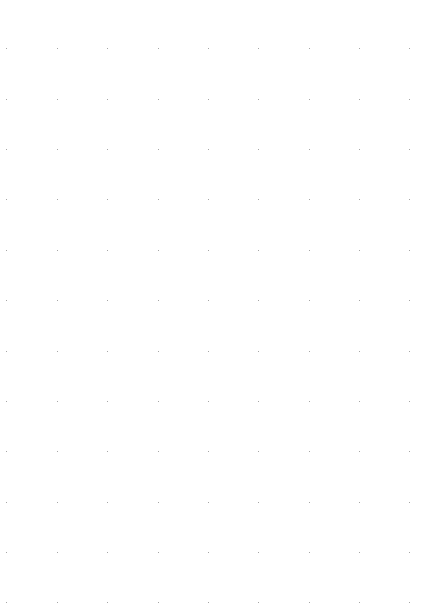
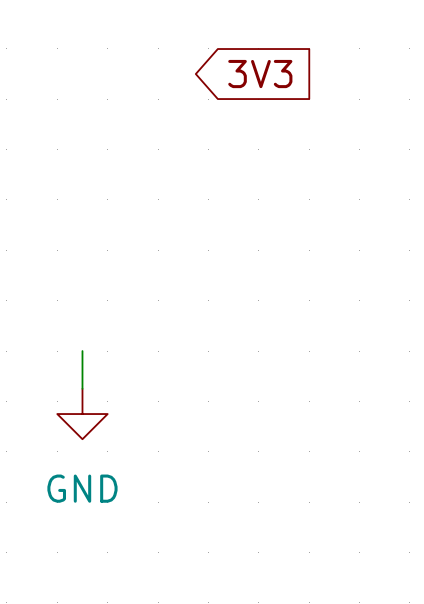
global label: none -> 3V3 (260, 74)
wire: none -> (82, 351) (82, 388)
power symbol: none -> GND (82, 414)

